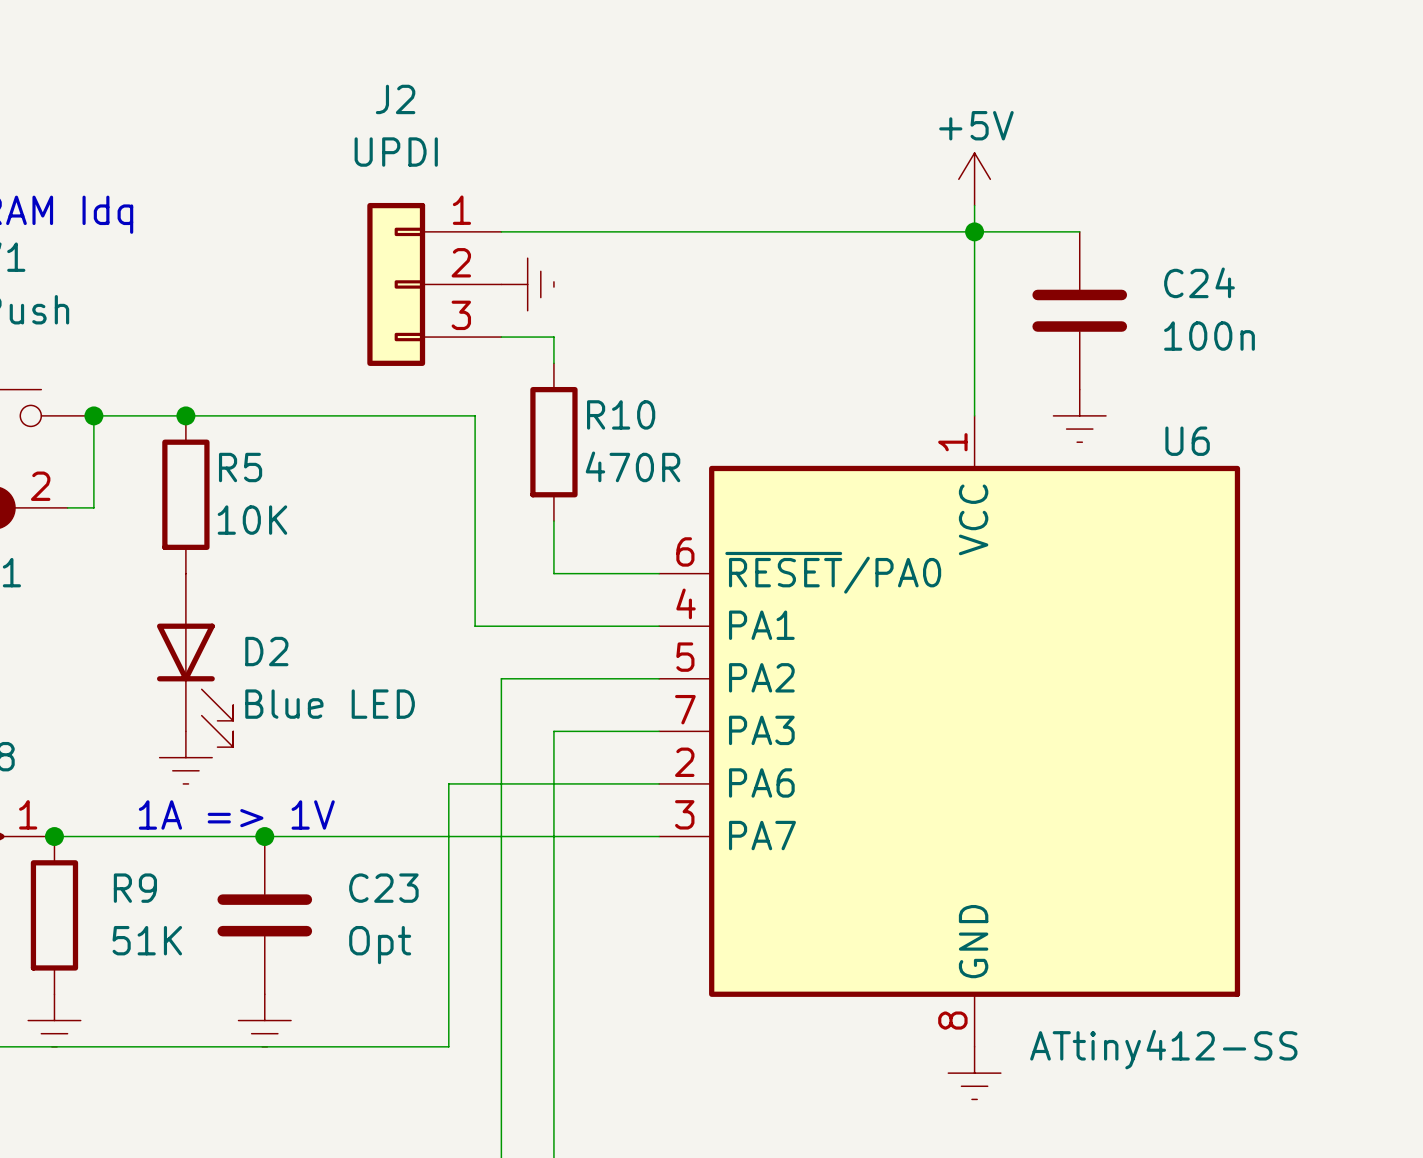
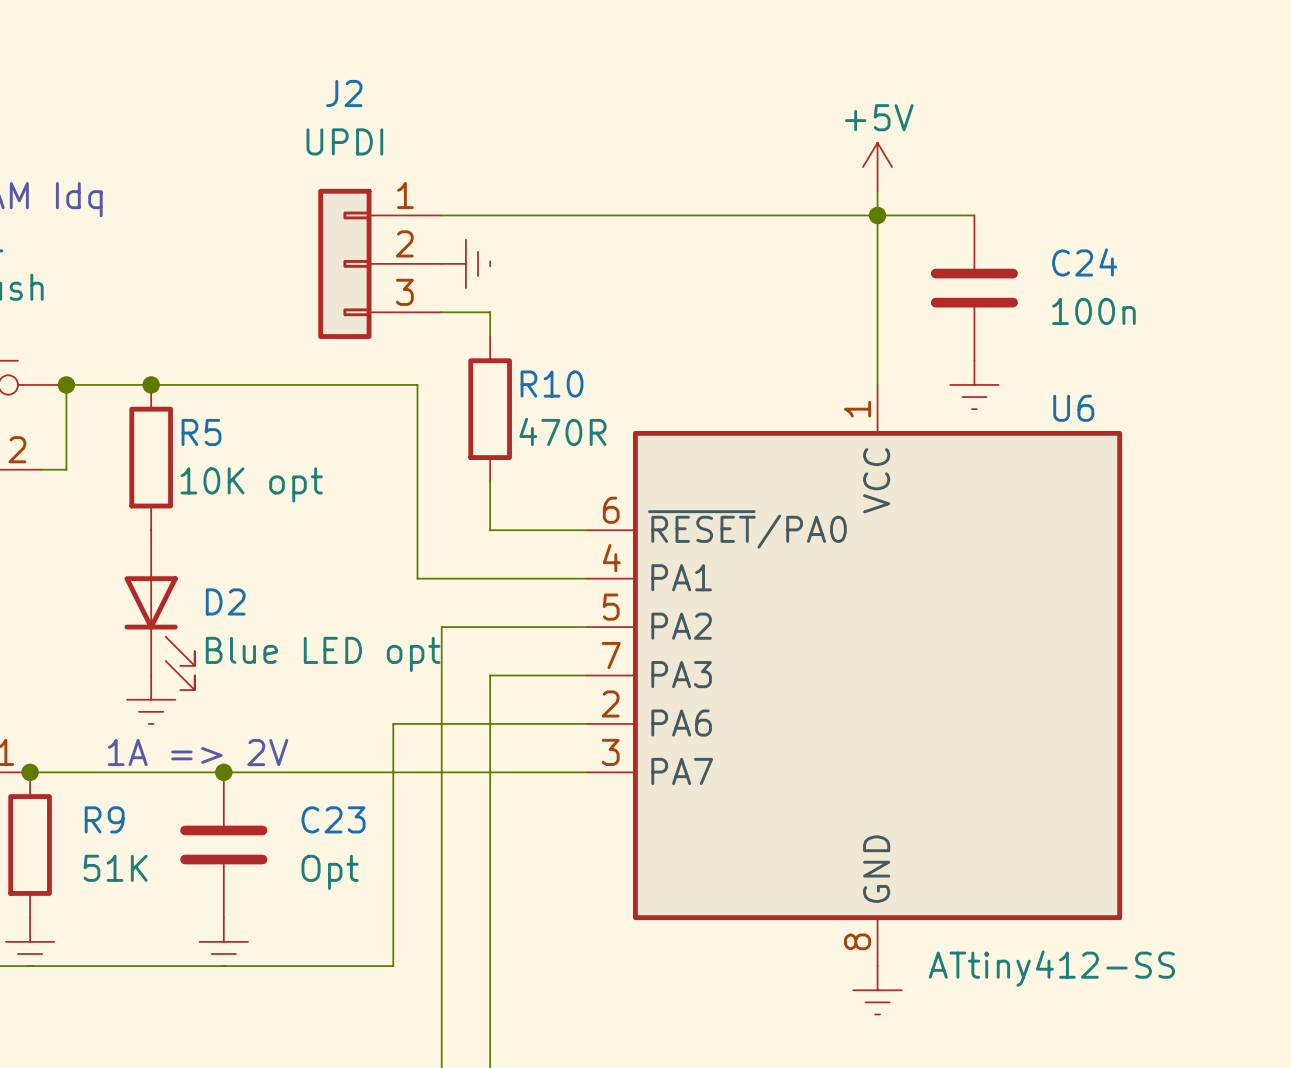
R5 value: 10K (252, 520) -> 10K opt (251, 484)
D2 value: Blue LED (330, 704) -> Blue LED opt (323, 654)
text: 1A => 1V (236, 814) -> 1A => 2V (198, 752)

